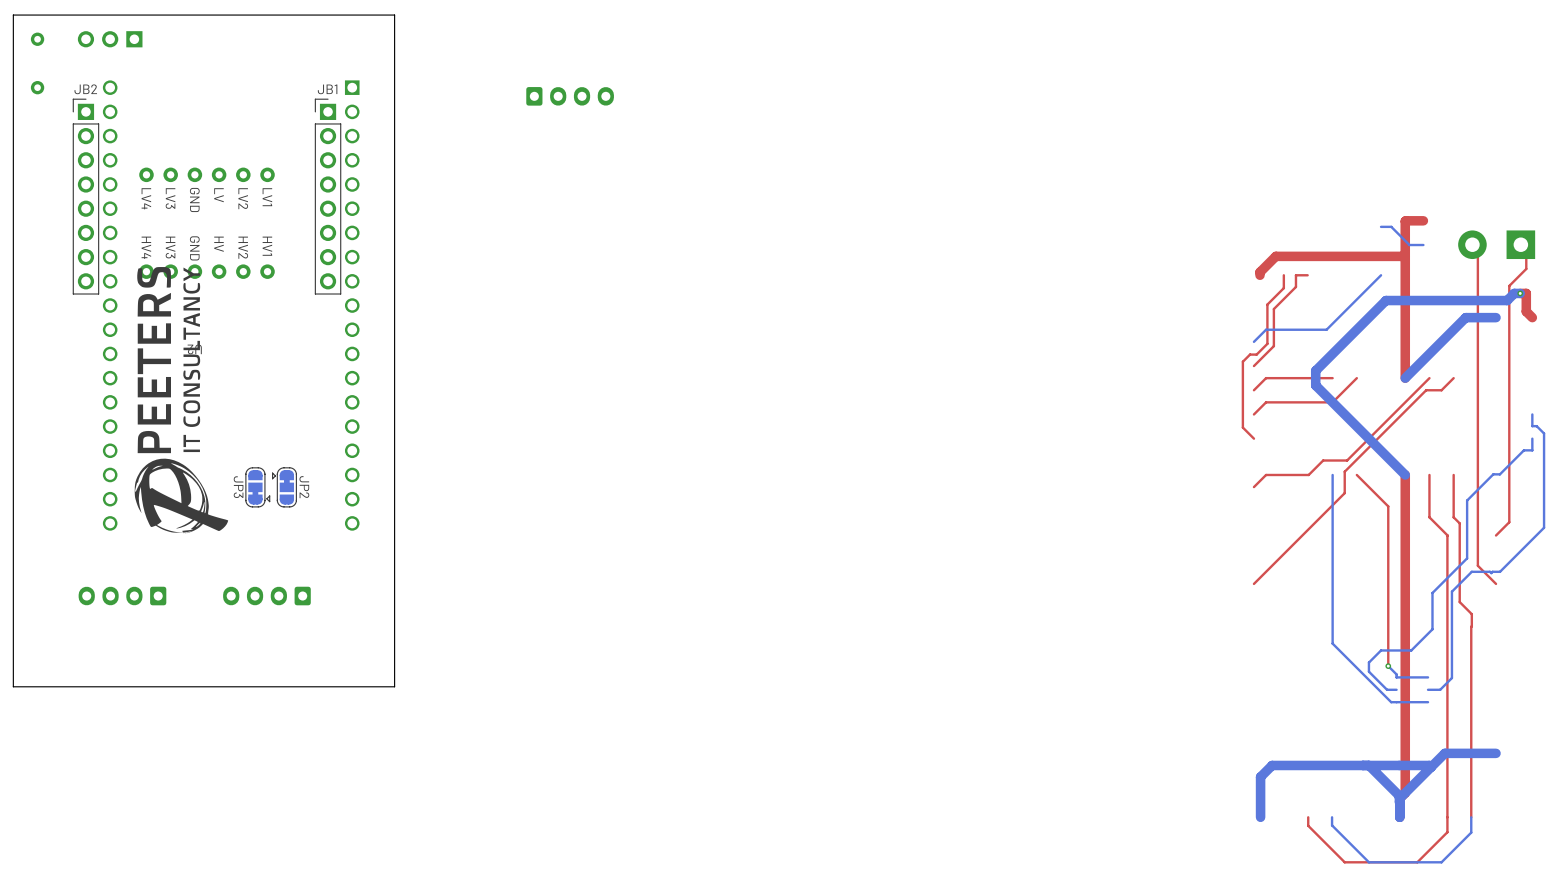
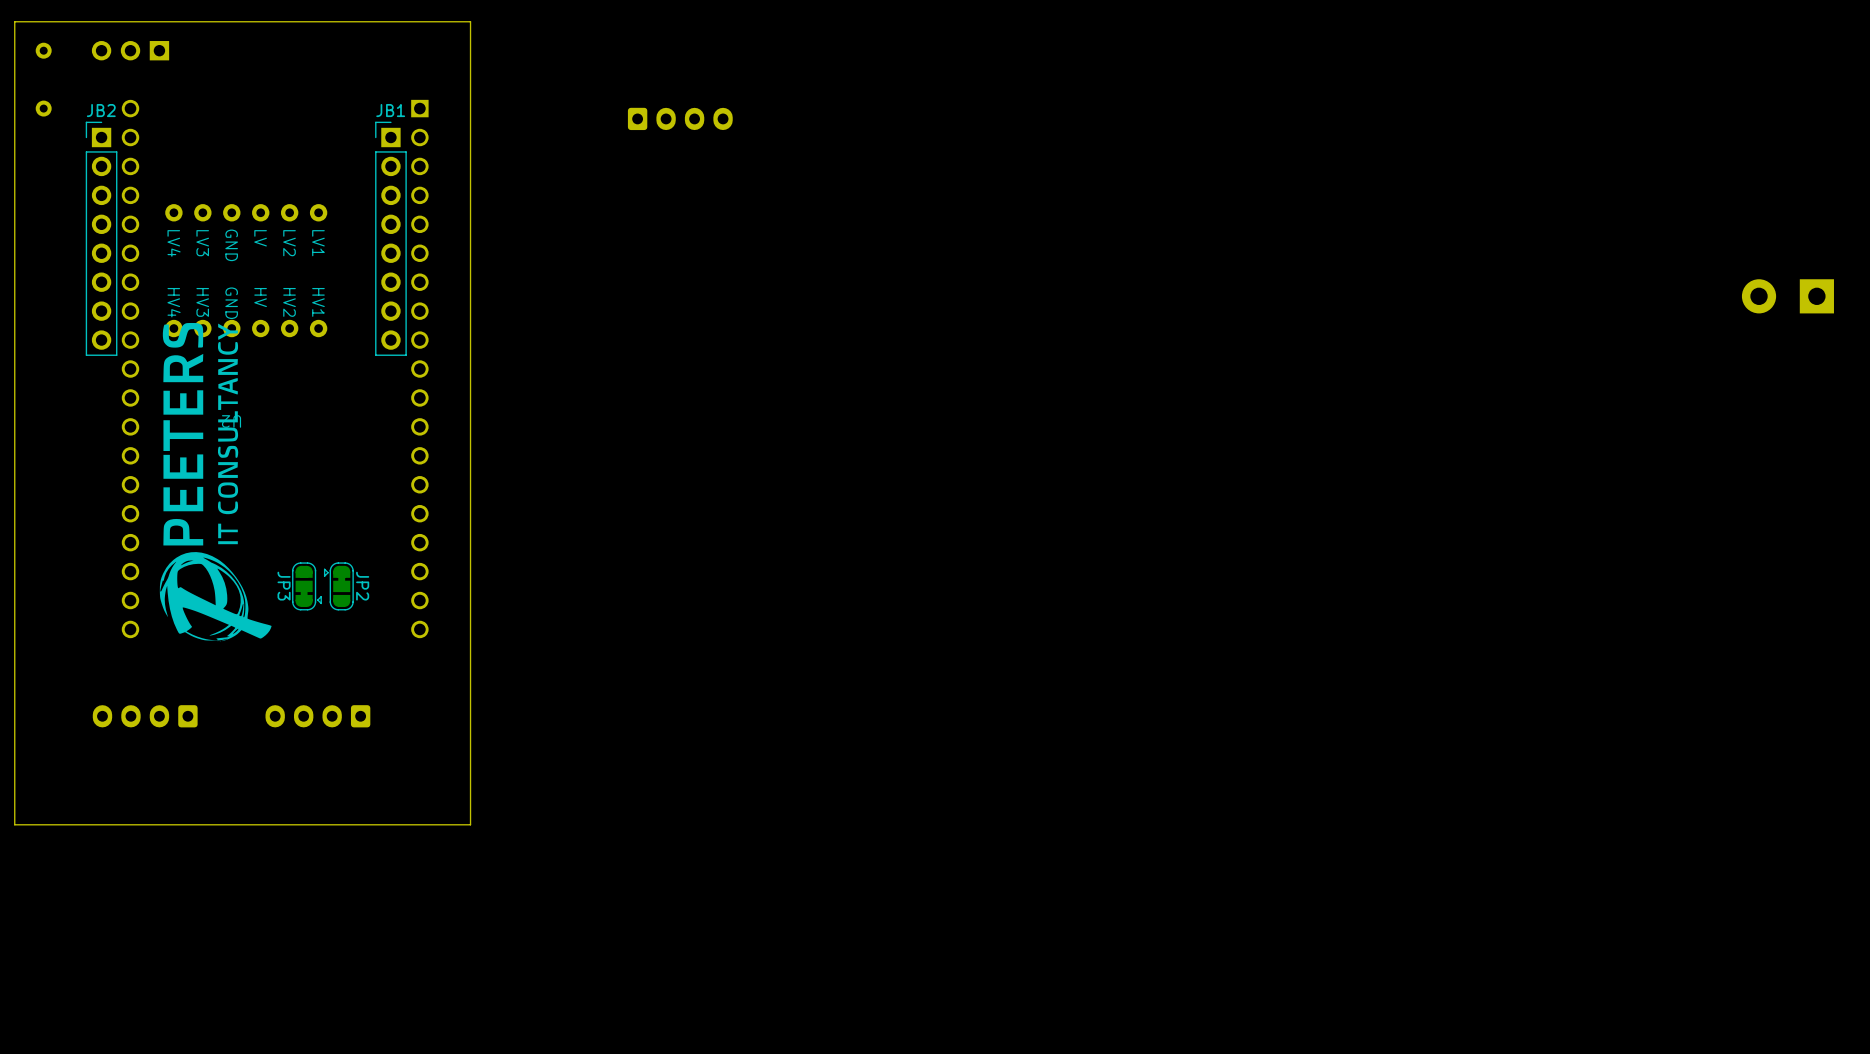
top track: (1423, 220) (1405, 221) (1405, 378) -> none
bottom track: (1381, 226) (1391, 226) (1409, 245) (1423, 245) -> none
top track: (1477, 251) (1477, 565) (1496, 583) -> none
top track: (1526, 251) (1526, 268) (1509, 285) (1509, 522) (1496, 535) -> none
top track: (1405, 256) (1275, 256) (1260, 272) (1260, 275) -> none
top track: (1283, 275) (1283, 288) (1267, 304) (1267, 343) (1256, 354) (1250, 354) (1242, 361) (1242, 427) (1253, 438) -> none
top track: (1307, 275) (1295, 275) (1295, 286) (1273, 309) (1273, 346) (1253, 366) -> none
bottom track: (1381, 275) (1326, 329) (1266, 329) (1253, 341) -> none
bottom track: (1520, 293) (1514, 293) (1507, 300) (1385, 300) (1315, 370) (1315, 385) (1405, 474) -> none
top track: (1520, 293) (1526, 293) (1526, 311) (1532, 317) -> none
via: (1520, 293) -> none
bottom track: (1496, 317) (1465, 317) (1405, 378) -> none
top track: (1332, 378) (1266, 378) (1253, 390) -> none
top track: (1356, 378) (1332, 402) (1266, 402) (1253, 414) -> none
top track: (1429, 378) (1347, 460) (1323, 460) (1308, 474) (1266, 474) (1253, 487) -> none
top track: (1453, 378) (1441, 390) (1426, 390) (1344, 471) (1344, 493) (1253, 583) -> none
bottom track: (1532, 414) (1532, 426) (1536, 426) (1544, 433) (1544, 527) (1500, 571) (1471, 571) (1451, 591) (1451, 678) (1440, 689) (1428, 689) -> none
bottom track: (1532, 438) (1532, 450) (1523, 450) (1499, 474) (1493, 474) (1467, 500) (1467, 558) (1432, 592) (1432, 629) (1411, 650) (1381, 650) (1368, 662) (1368, 671) (1387, 689) (1396, 689) -> none
bottom track: (1332, 474) (1332, 643) (1391, 702) (1428, 702) -> none
top track: (1356, 474) (1388, 506) (1388, 666) -> none
top track: (1405, 474) (1405, 792) (1399, 798) (1399, 817) -> none
top track: (1429, 474) (1429, 517) (1447, 535) (1447, 832) (1417, 862) (1344, 862) (1308, 825) (1308, 817) -> none
top track: (1453, 474) (1453, 517) (1459, 523) (1459, 602) (1471, 614) (1471, 817) -> none
bottom track: (1388, 666) (1396, 674) (1396, 677) (1428, 677) -> none
via: (1388, 666) -> none
bottom track: (1496, 753) (1444, 753) (1399, 797) -> none
bottom track: (1368, 765) (1399, 796) (1399, 817) -> none
bottom track: (1431, 767) (1429, 765) (1272, 765) (1260, 777) (1260, 817) -> none
bottom track: (1471, 817) (1471, 832) (1441, 862) (1368, 862) (1332, 825) (1332, 817) -> none

